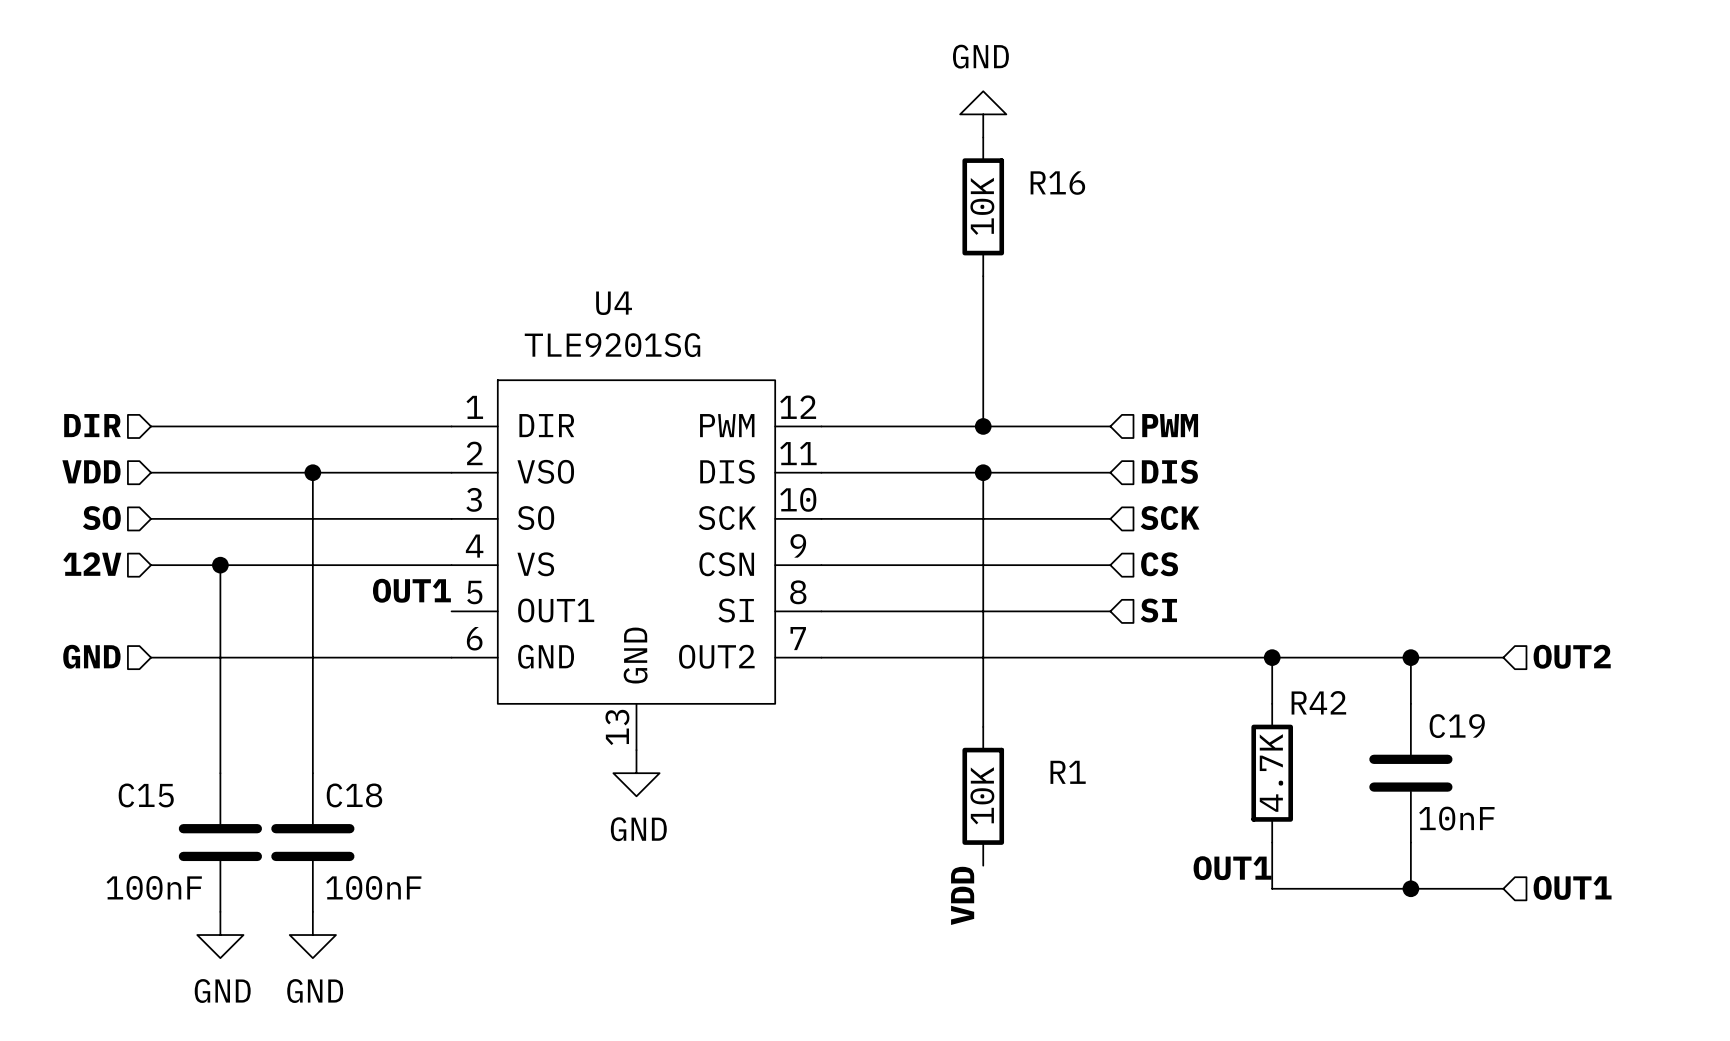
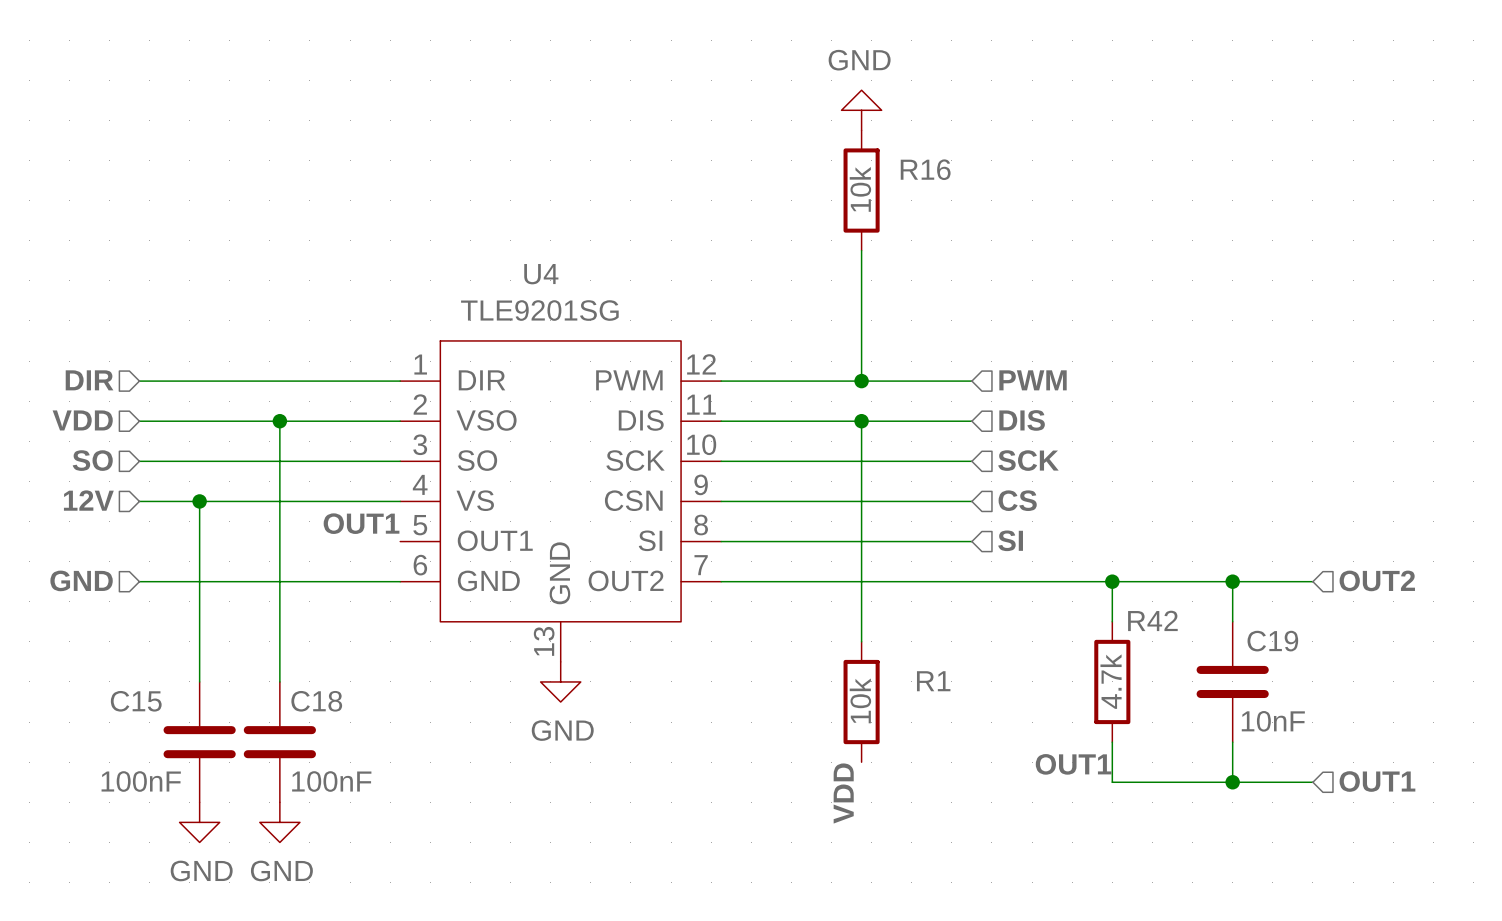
R16 value: 10K (982, 206) -> 10k (860, 189)
R42 value: 4.7K (1271, 773) -> 4.7k (1111, 681)
R1 value: 10K (982, 795) -> 10k (860, 700)

